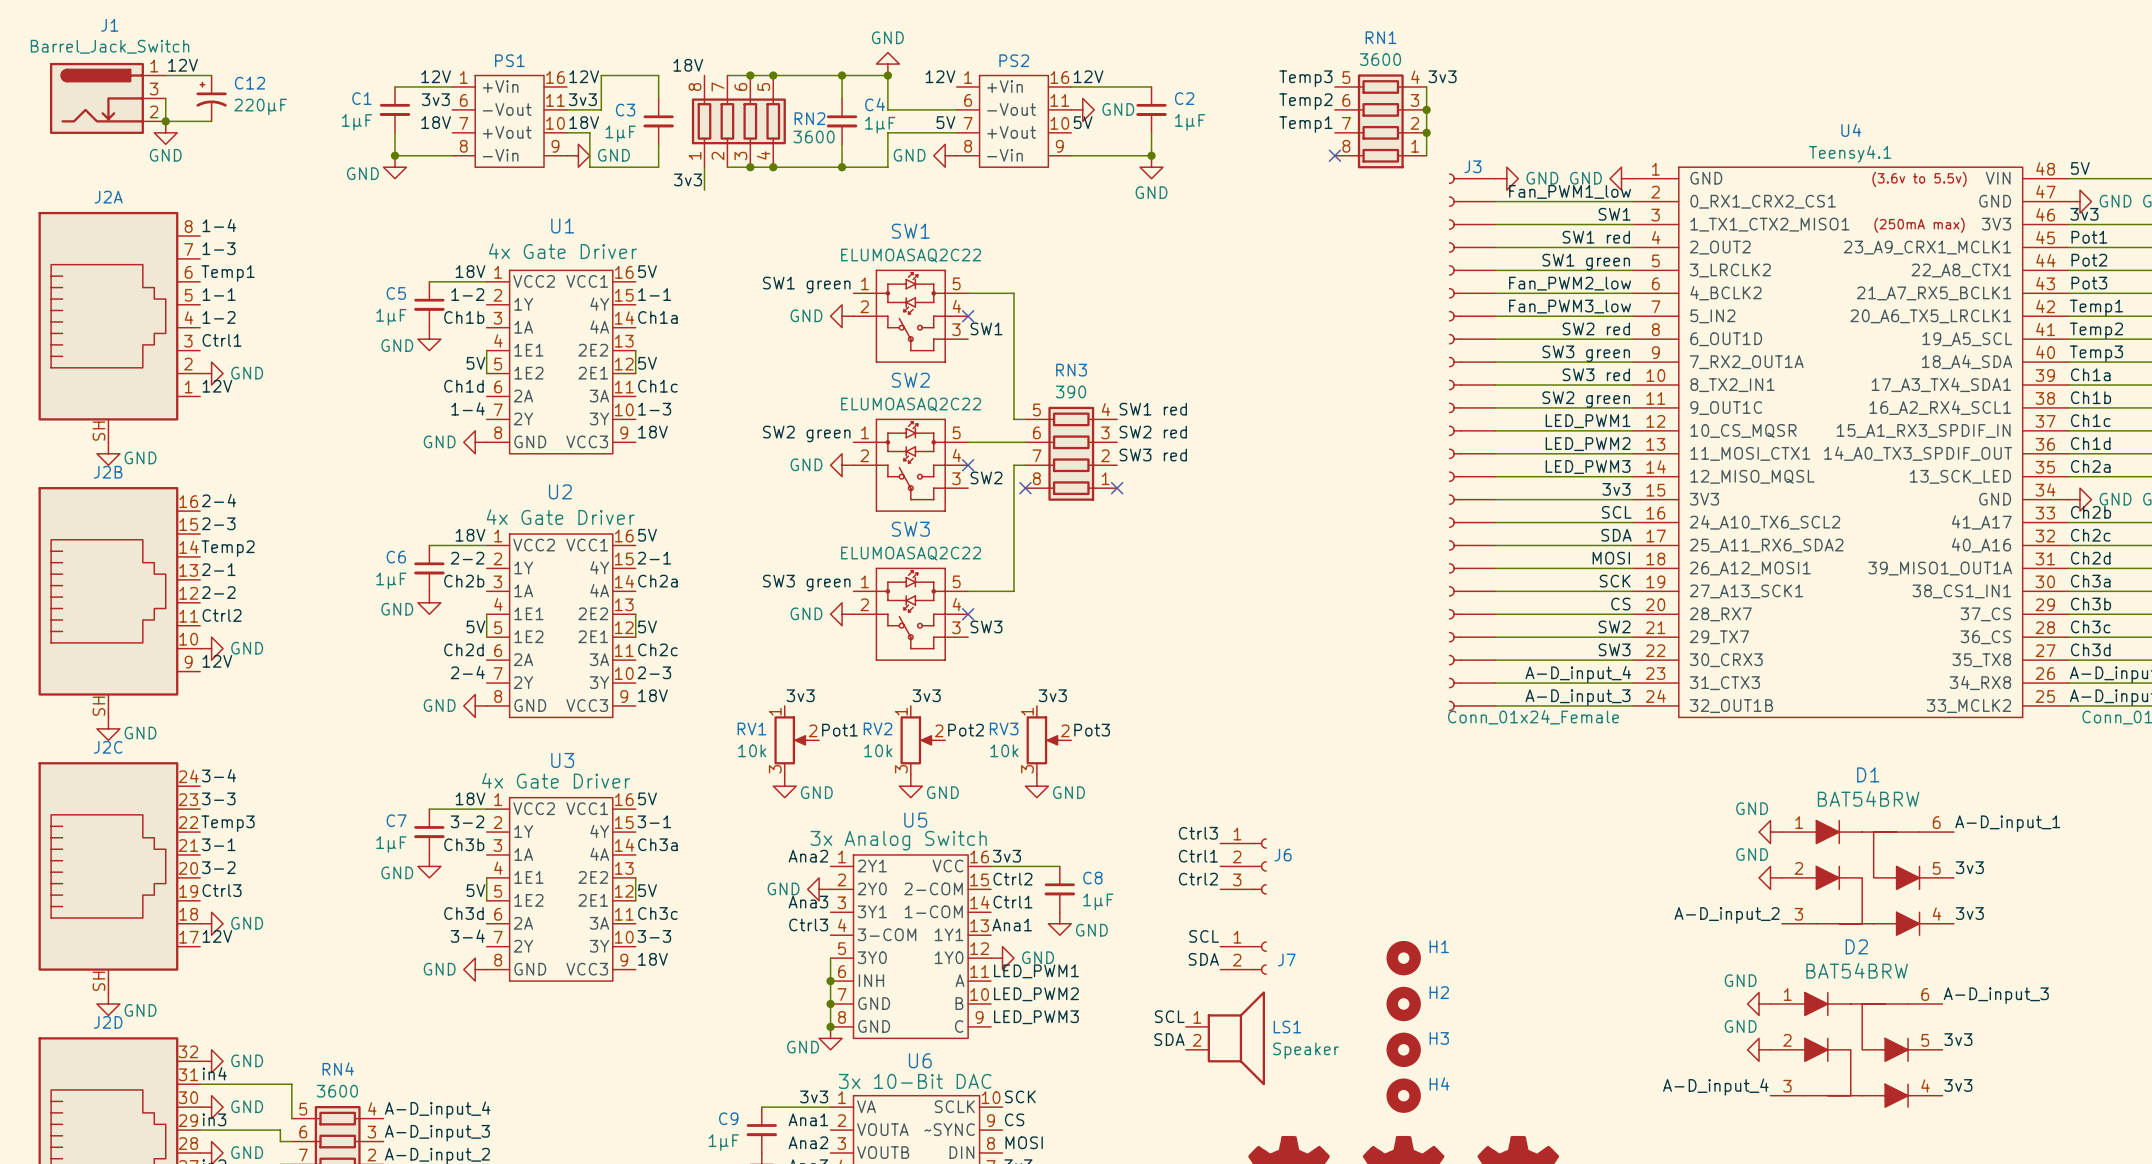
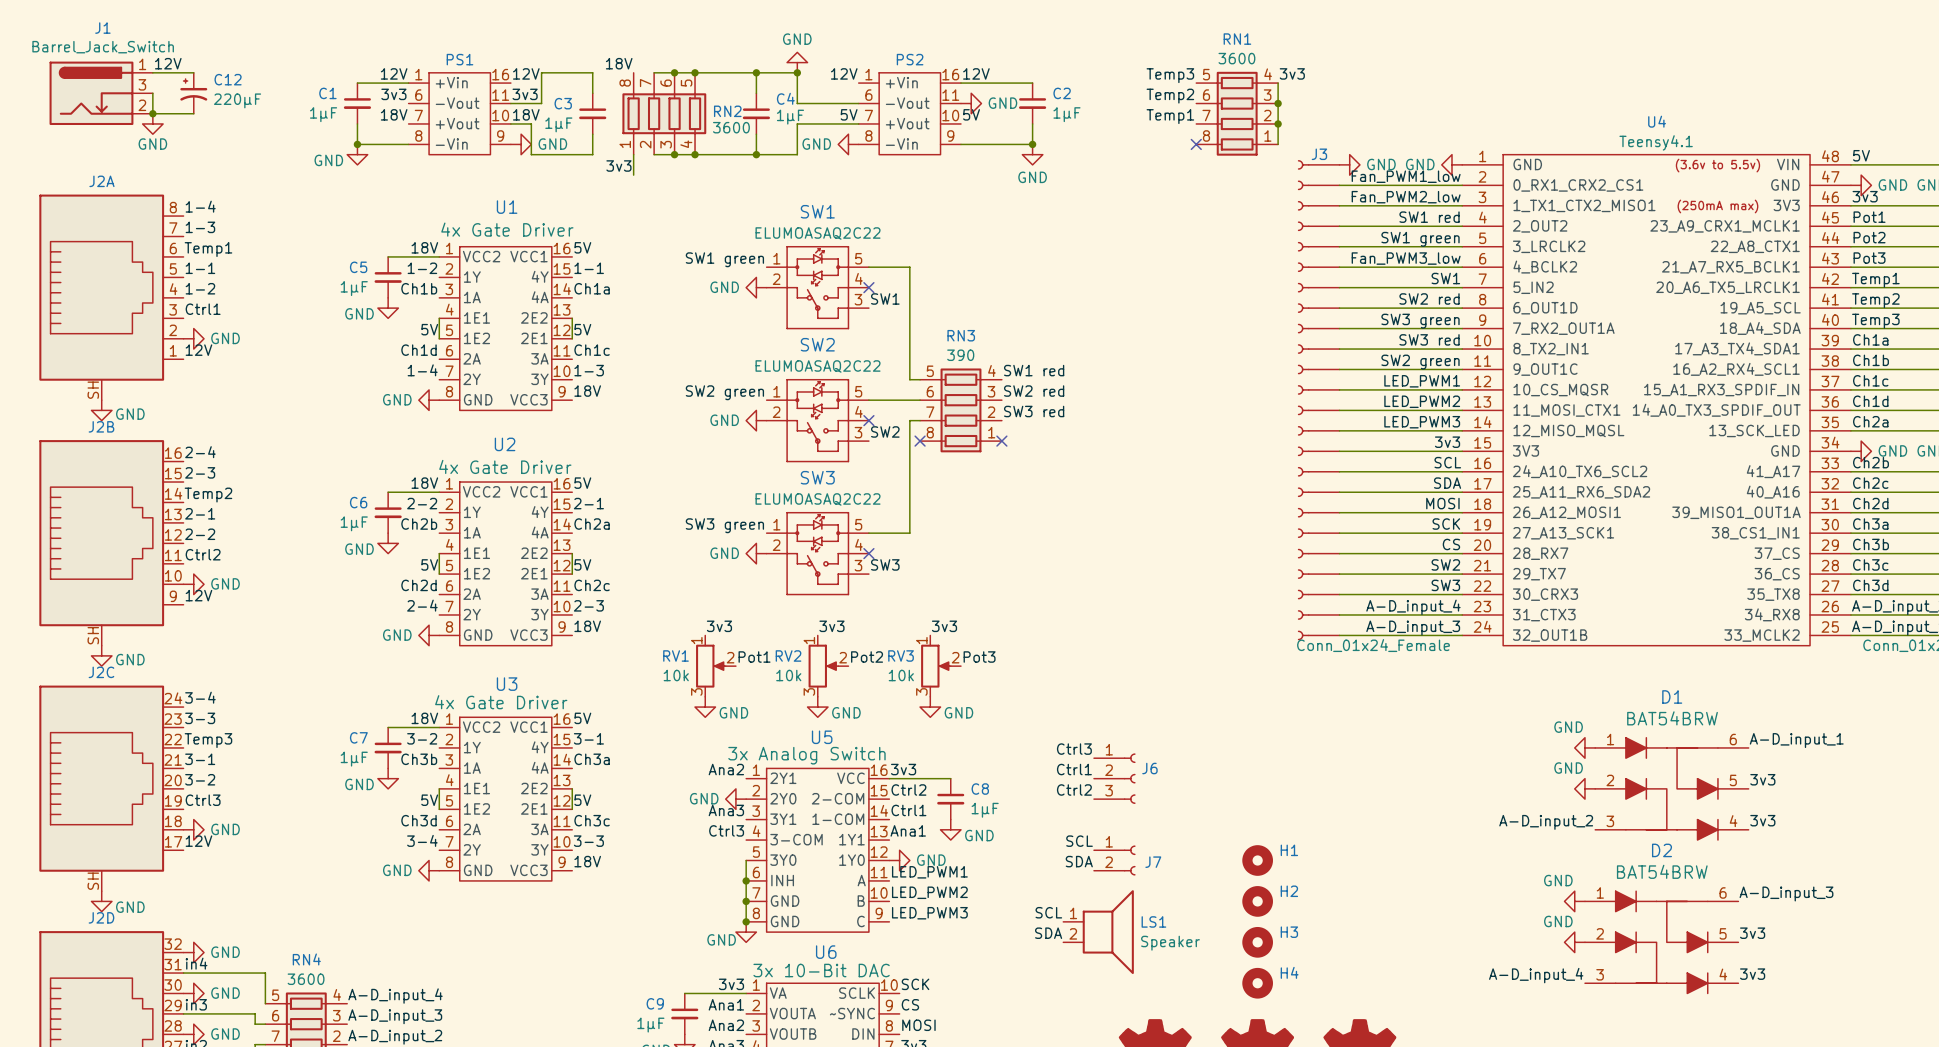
label: SW1 (1614, 214) -> Fan_PWM2_low (1406, 197)
label: Fan_PWM2_low (1570, 283) -> Fan_PWM3_low (1406, 258)
label: Fan_PWM3_low (1570, 306) -> SW1 (1445, 278)

